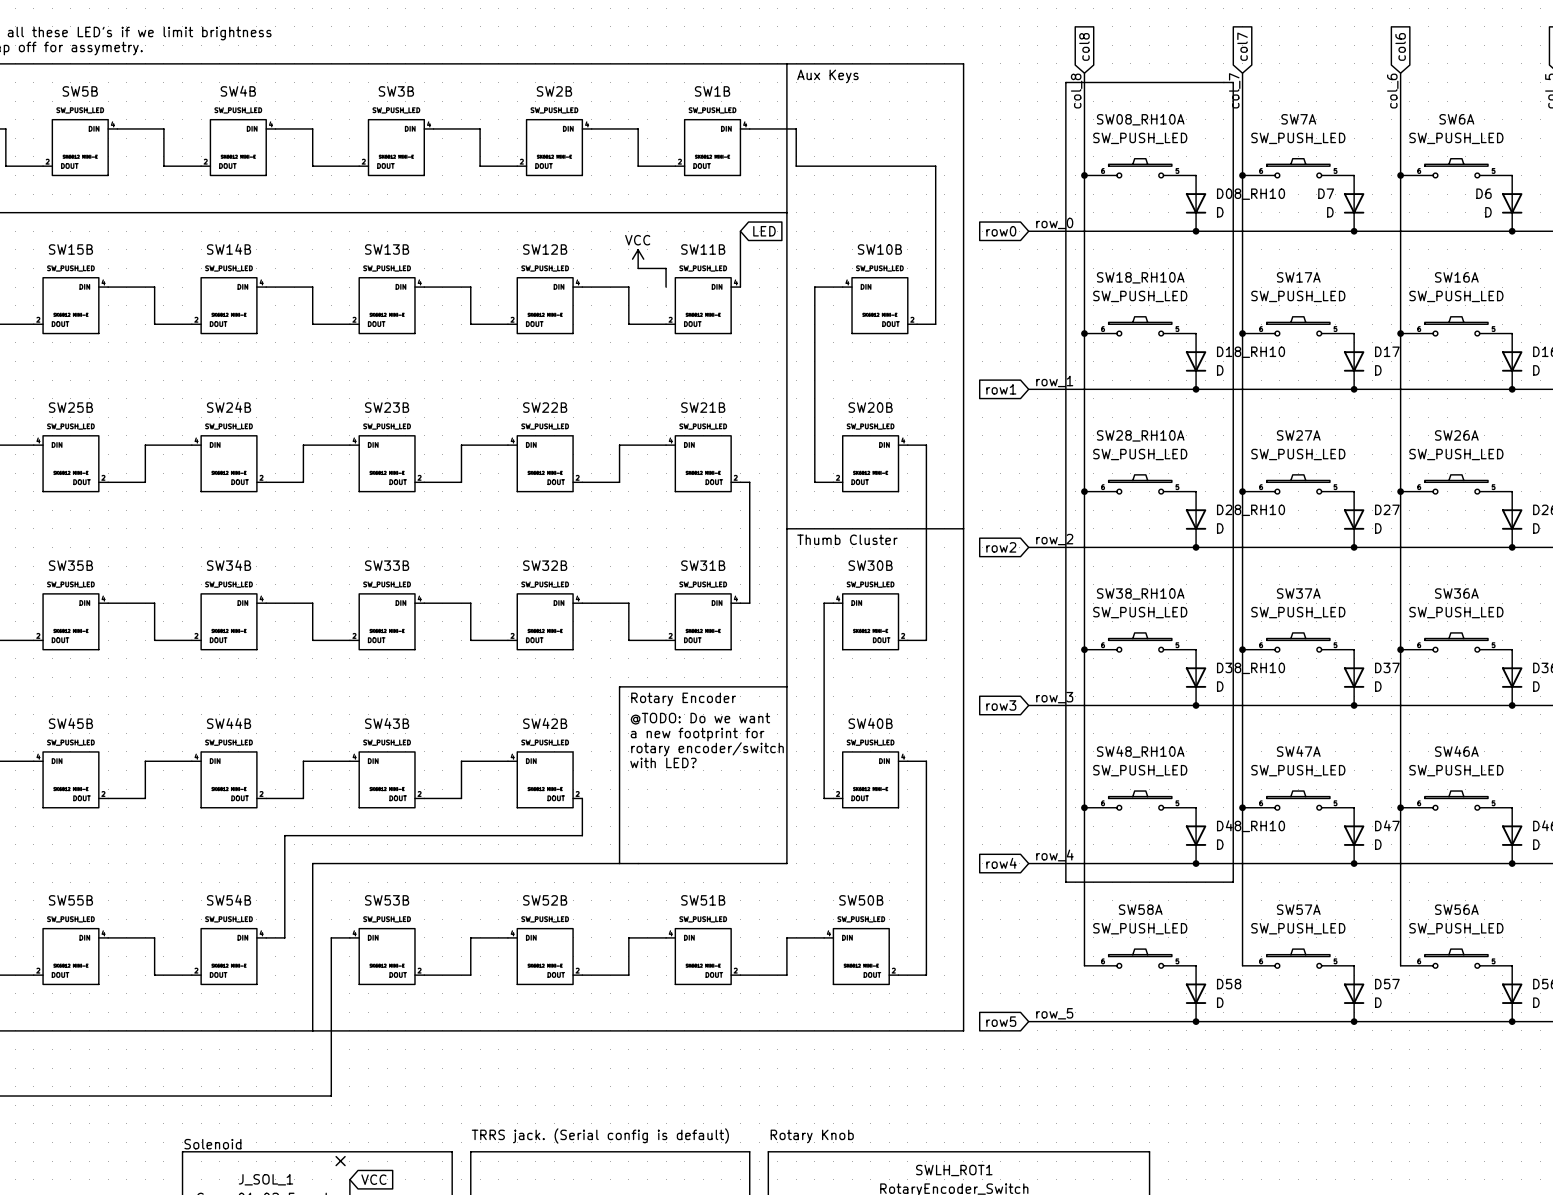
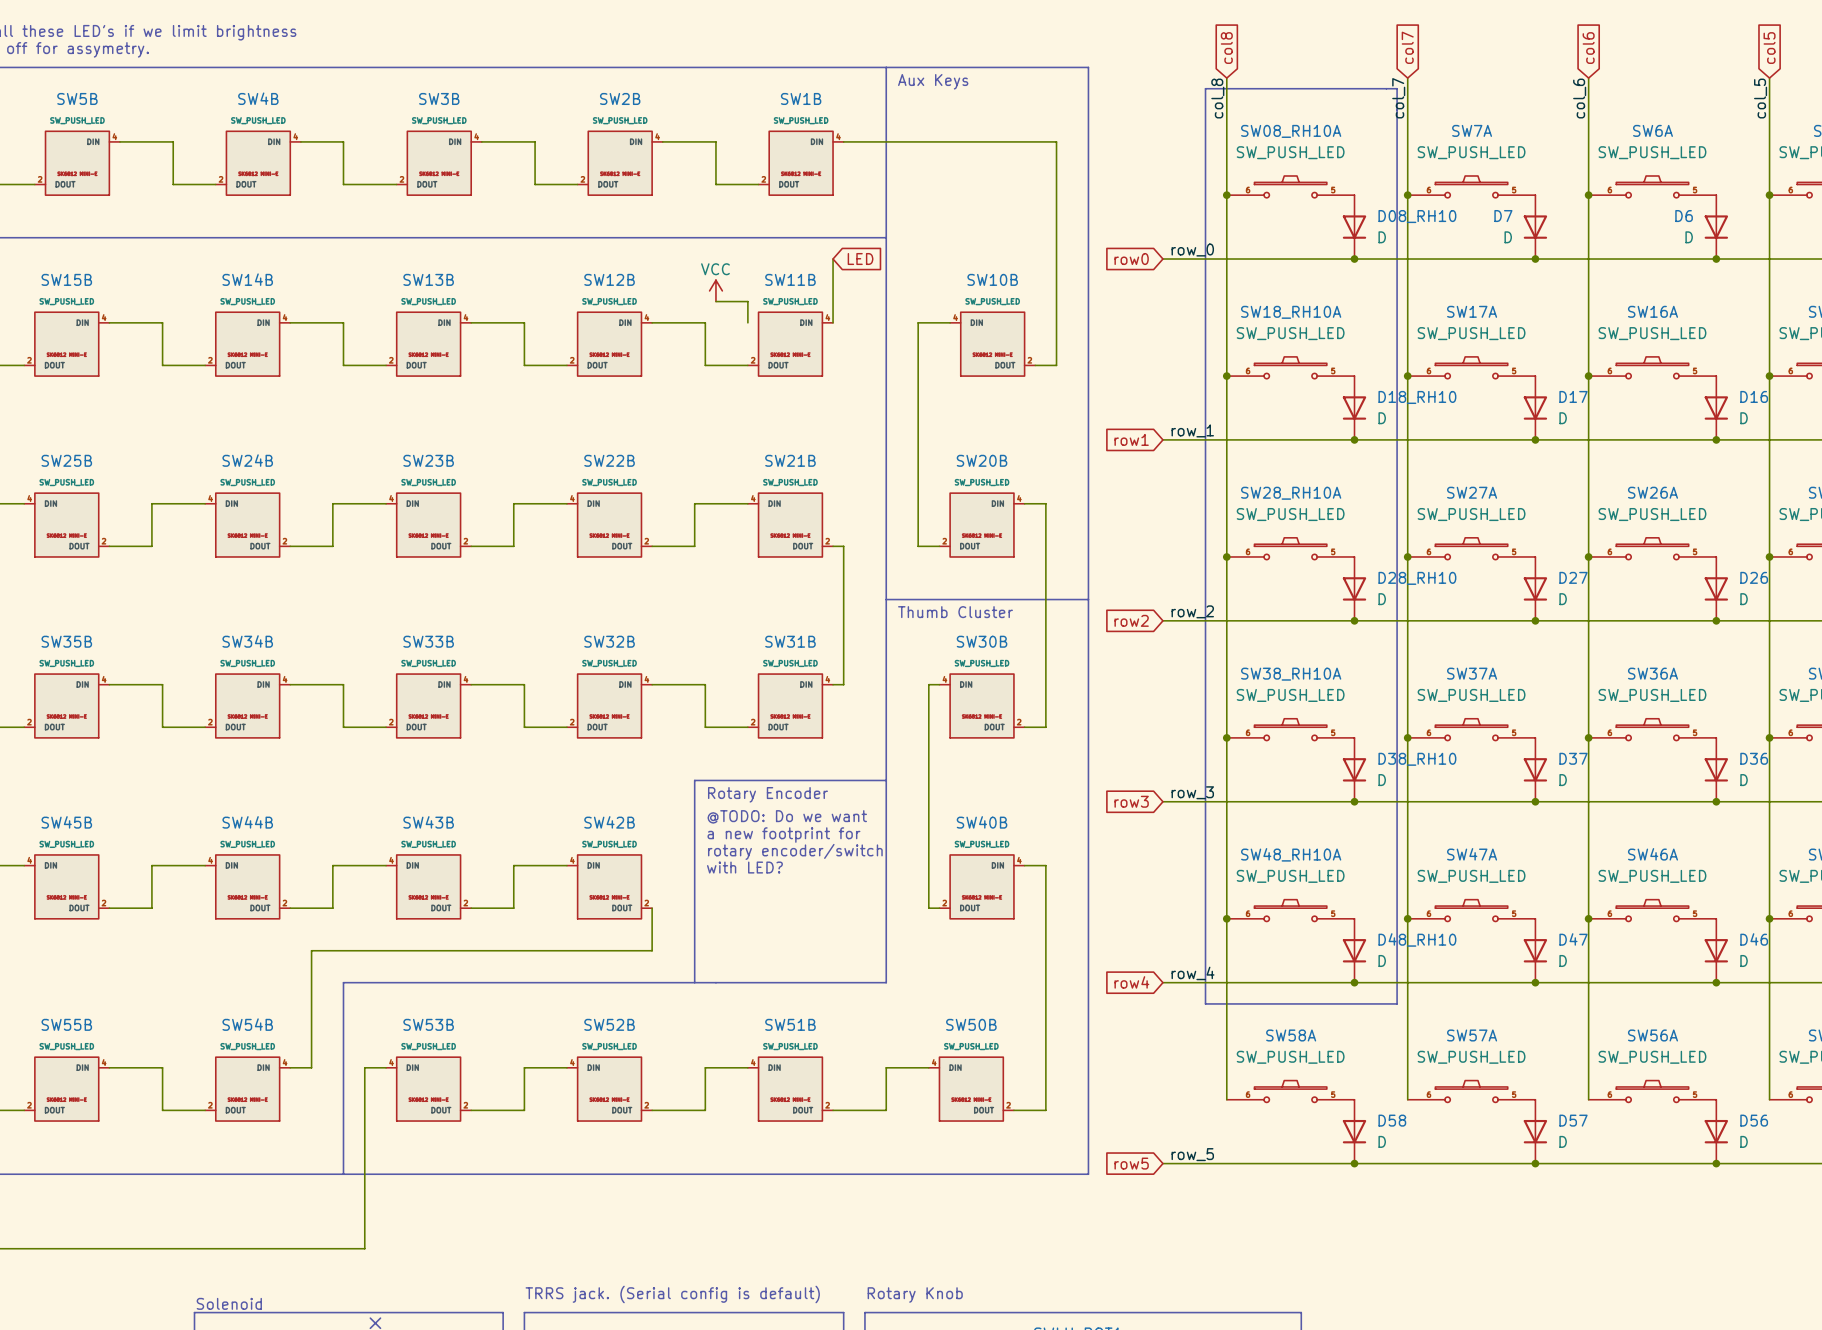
wire: (796, 128) (796, 166) (935, 166) -> (896, 141) (1056, 141) (1056, 184)

